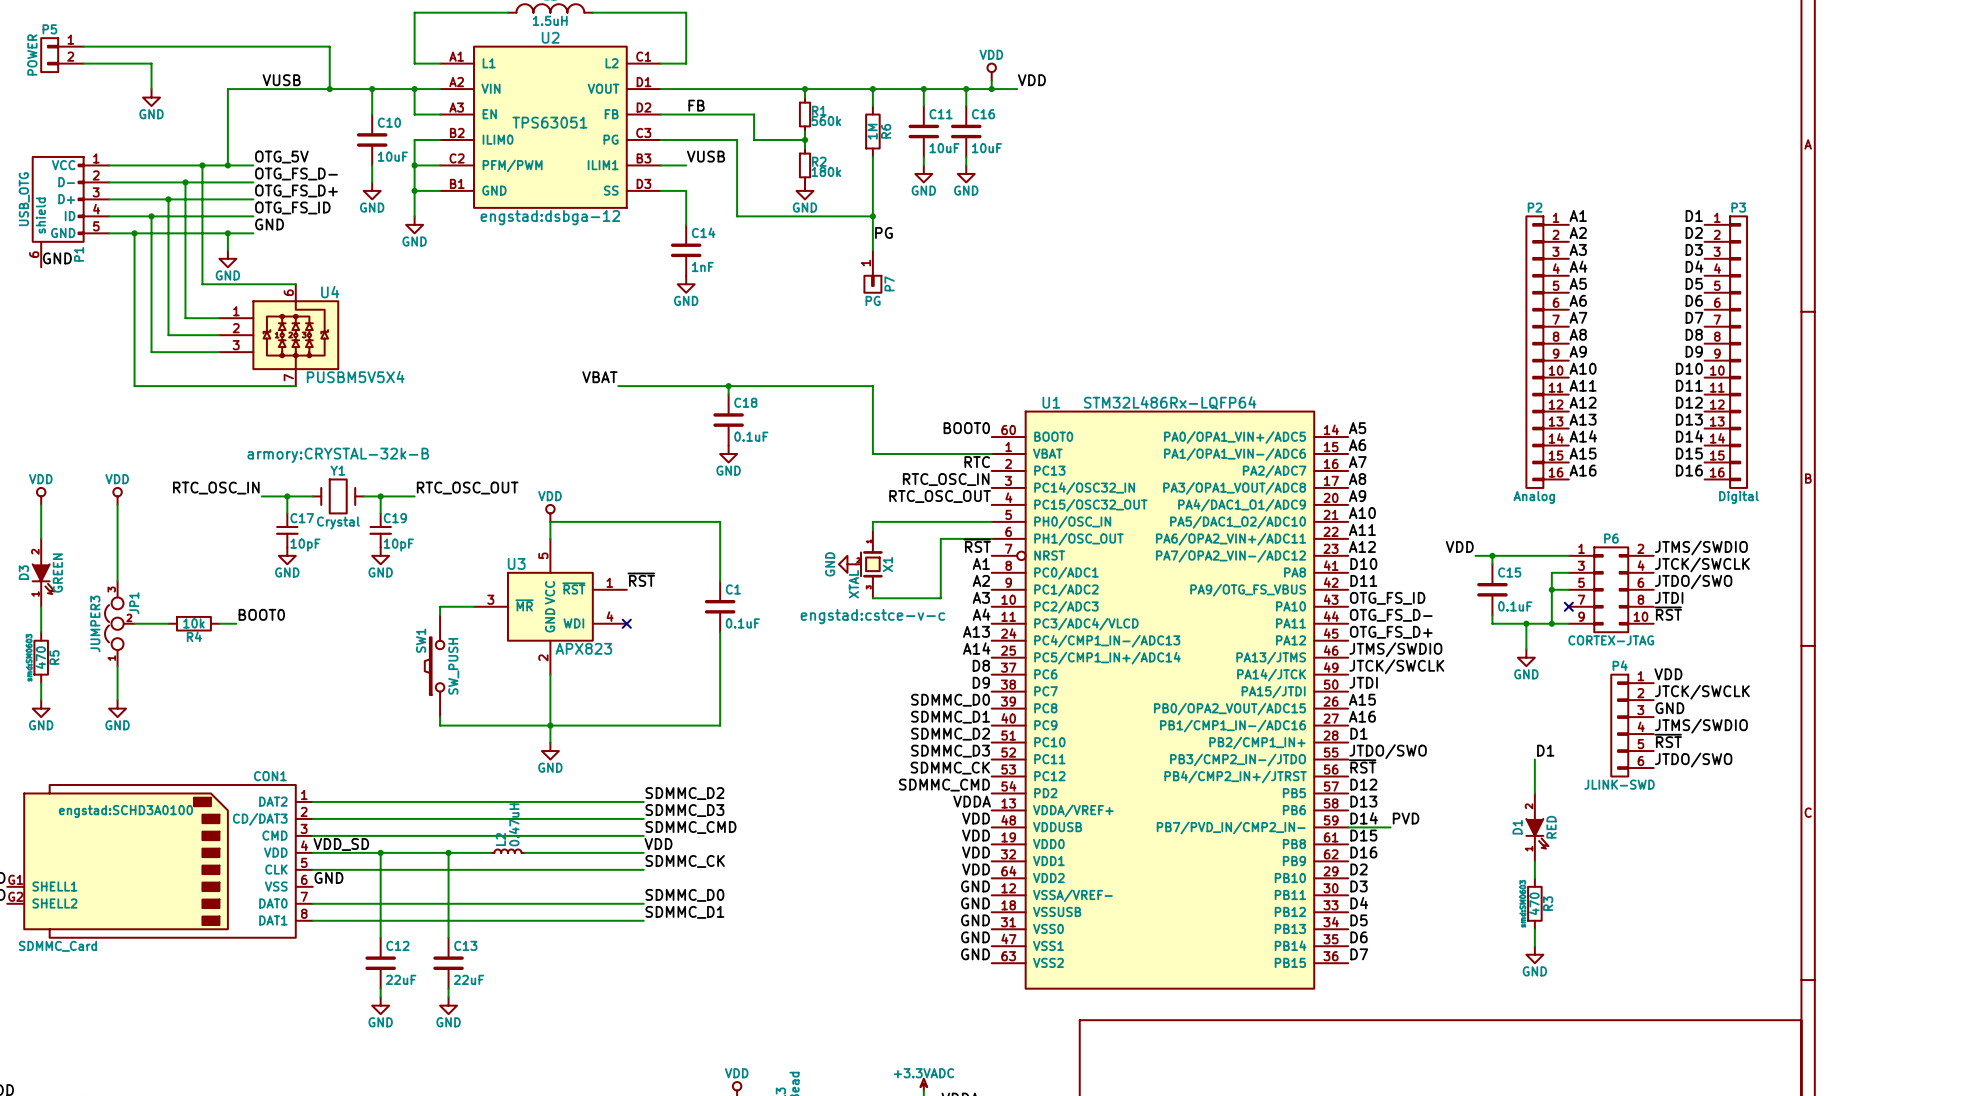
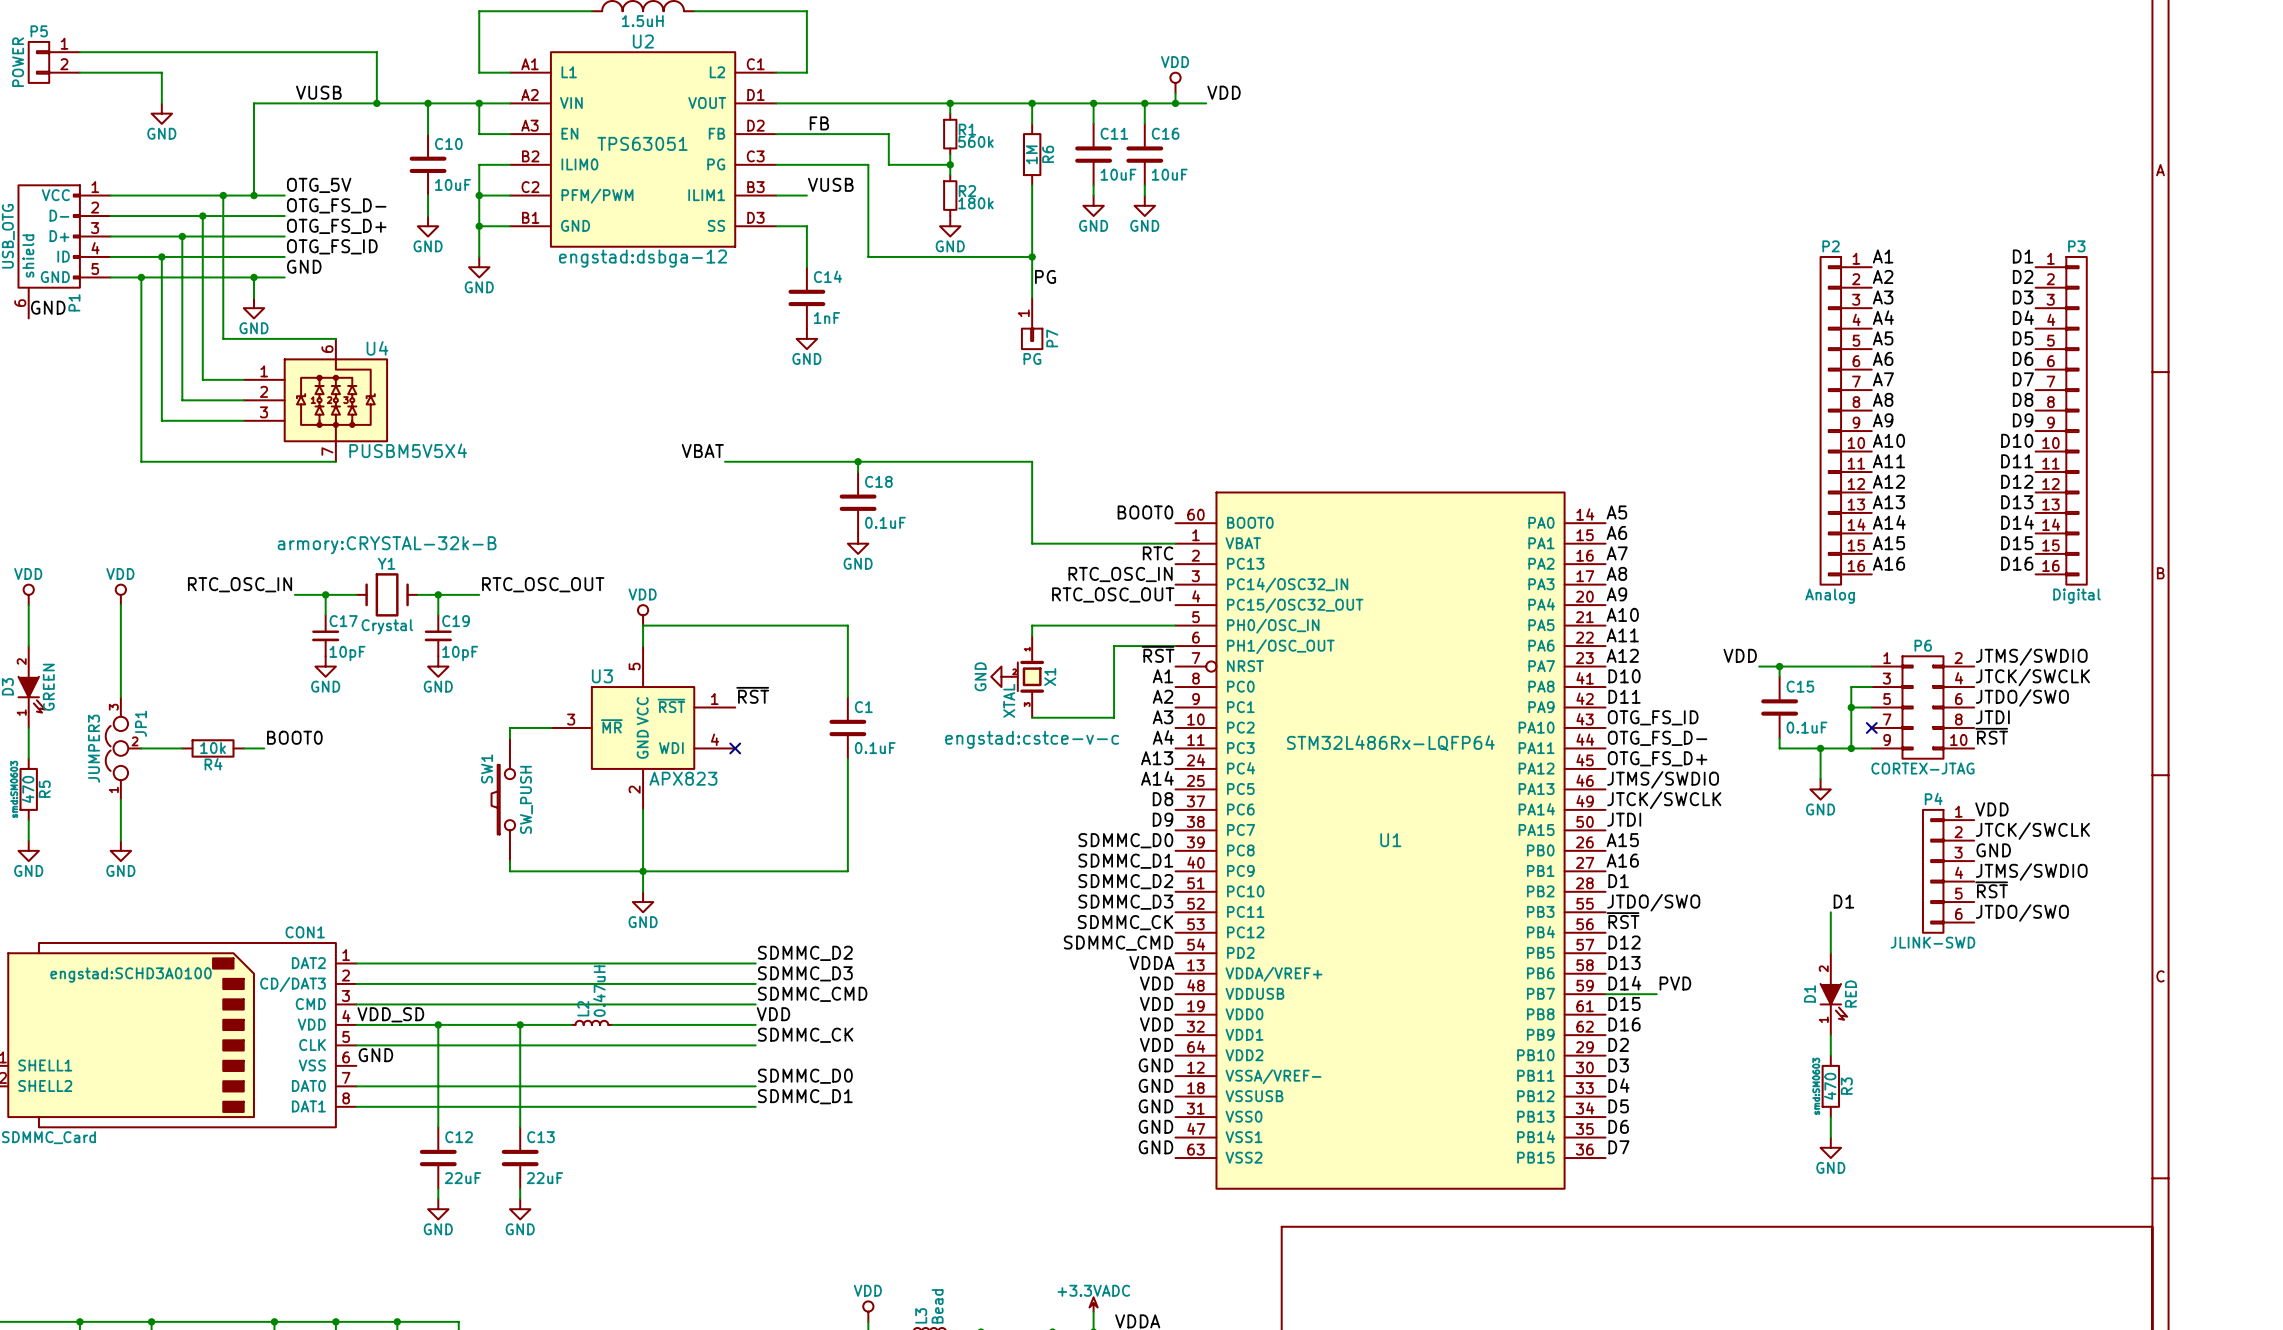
U1 name position: U1 (1051, 402) -> U1 (1390, 840)
U1 value position: STM32L486Rx-LQFP64 (1170, 402) -> STM32L486Rx-LQFP64 (1390, 743)
U1 symbol: [991, 411, 1349, 989] -> [1175, 492, 1606, 1189]

